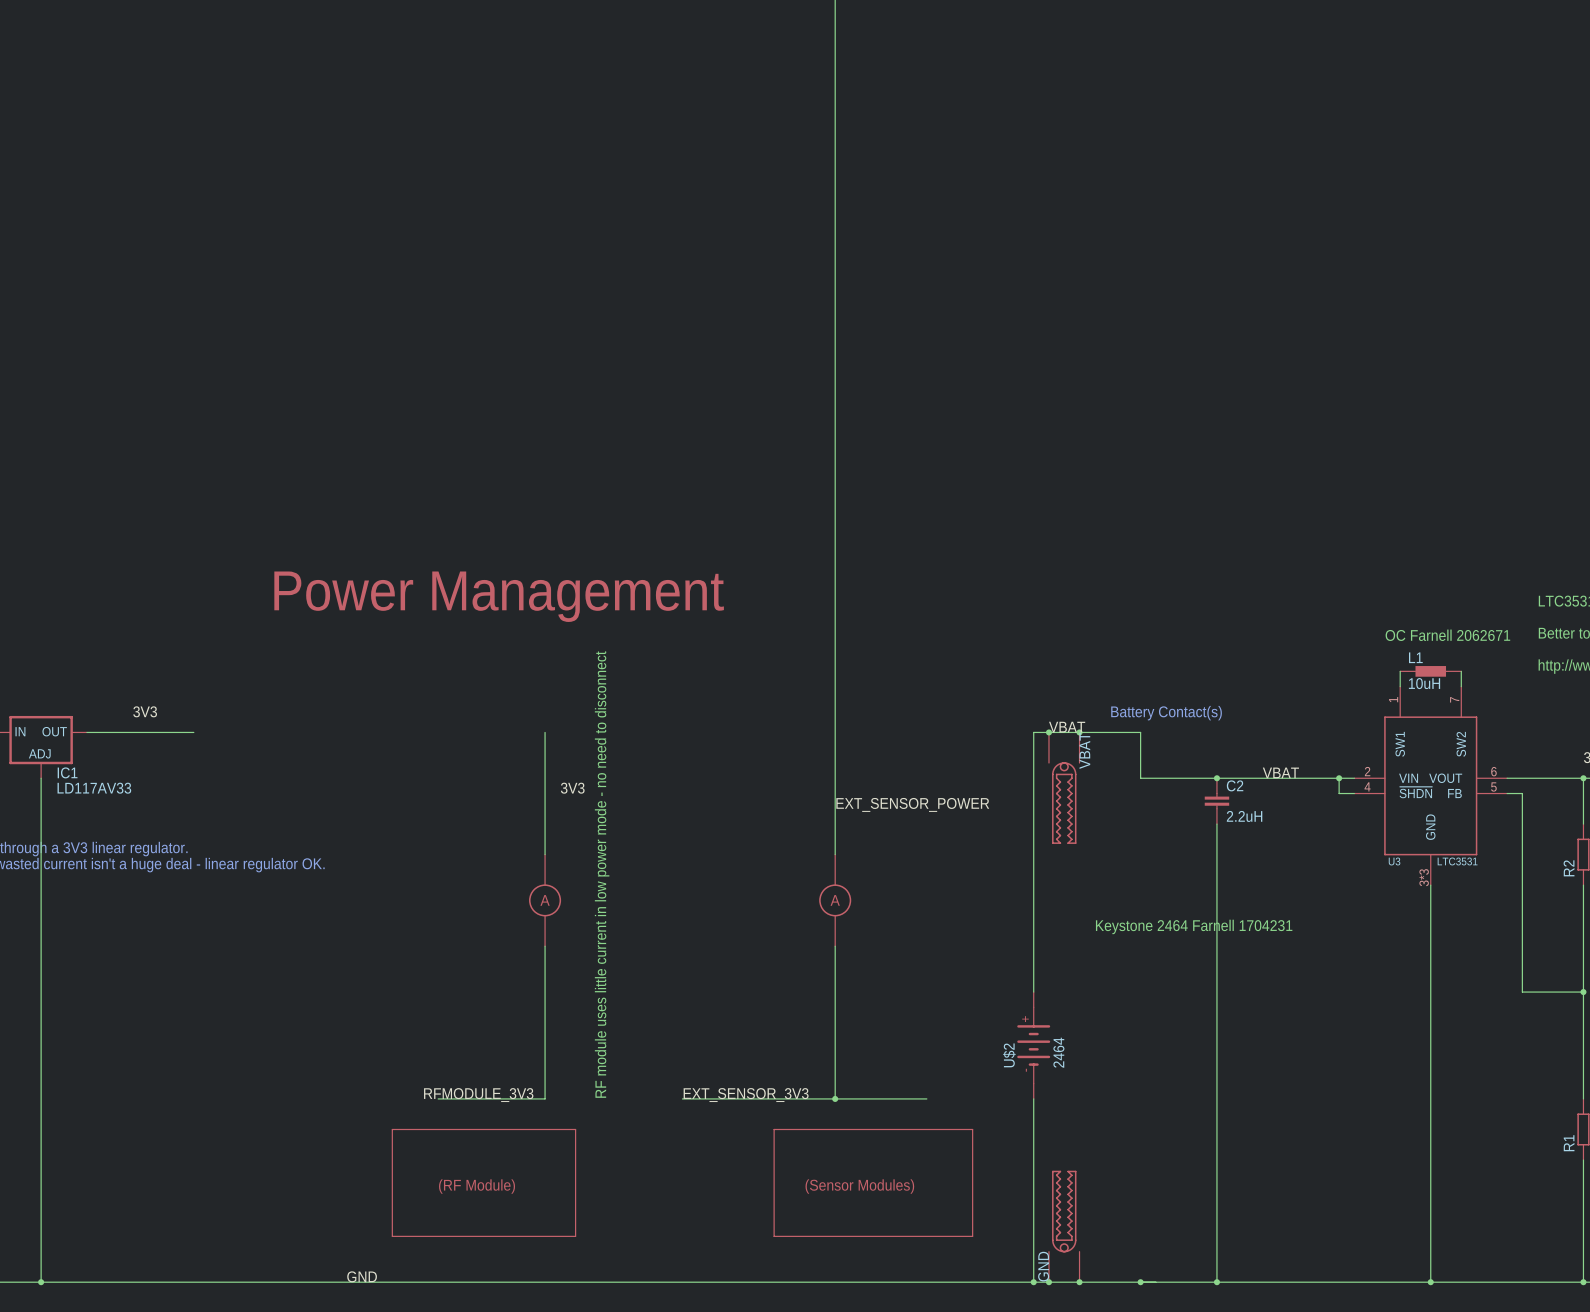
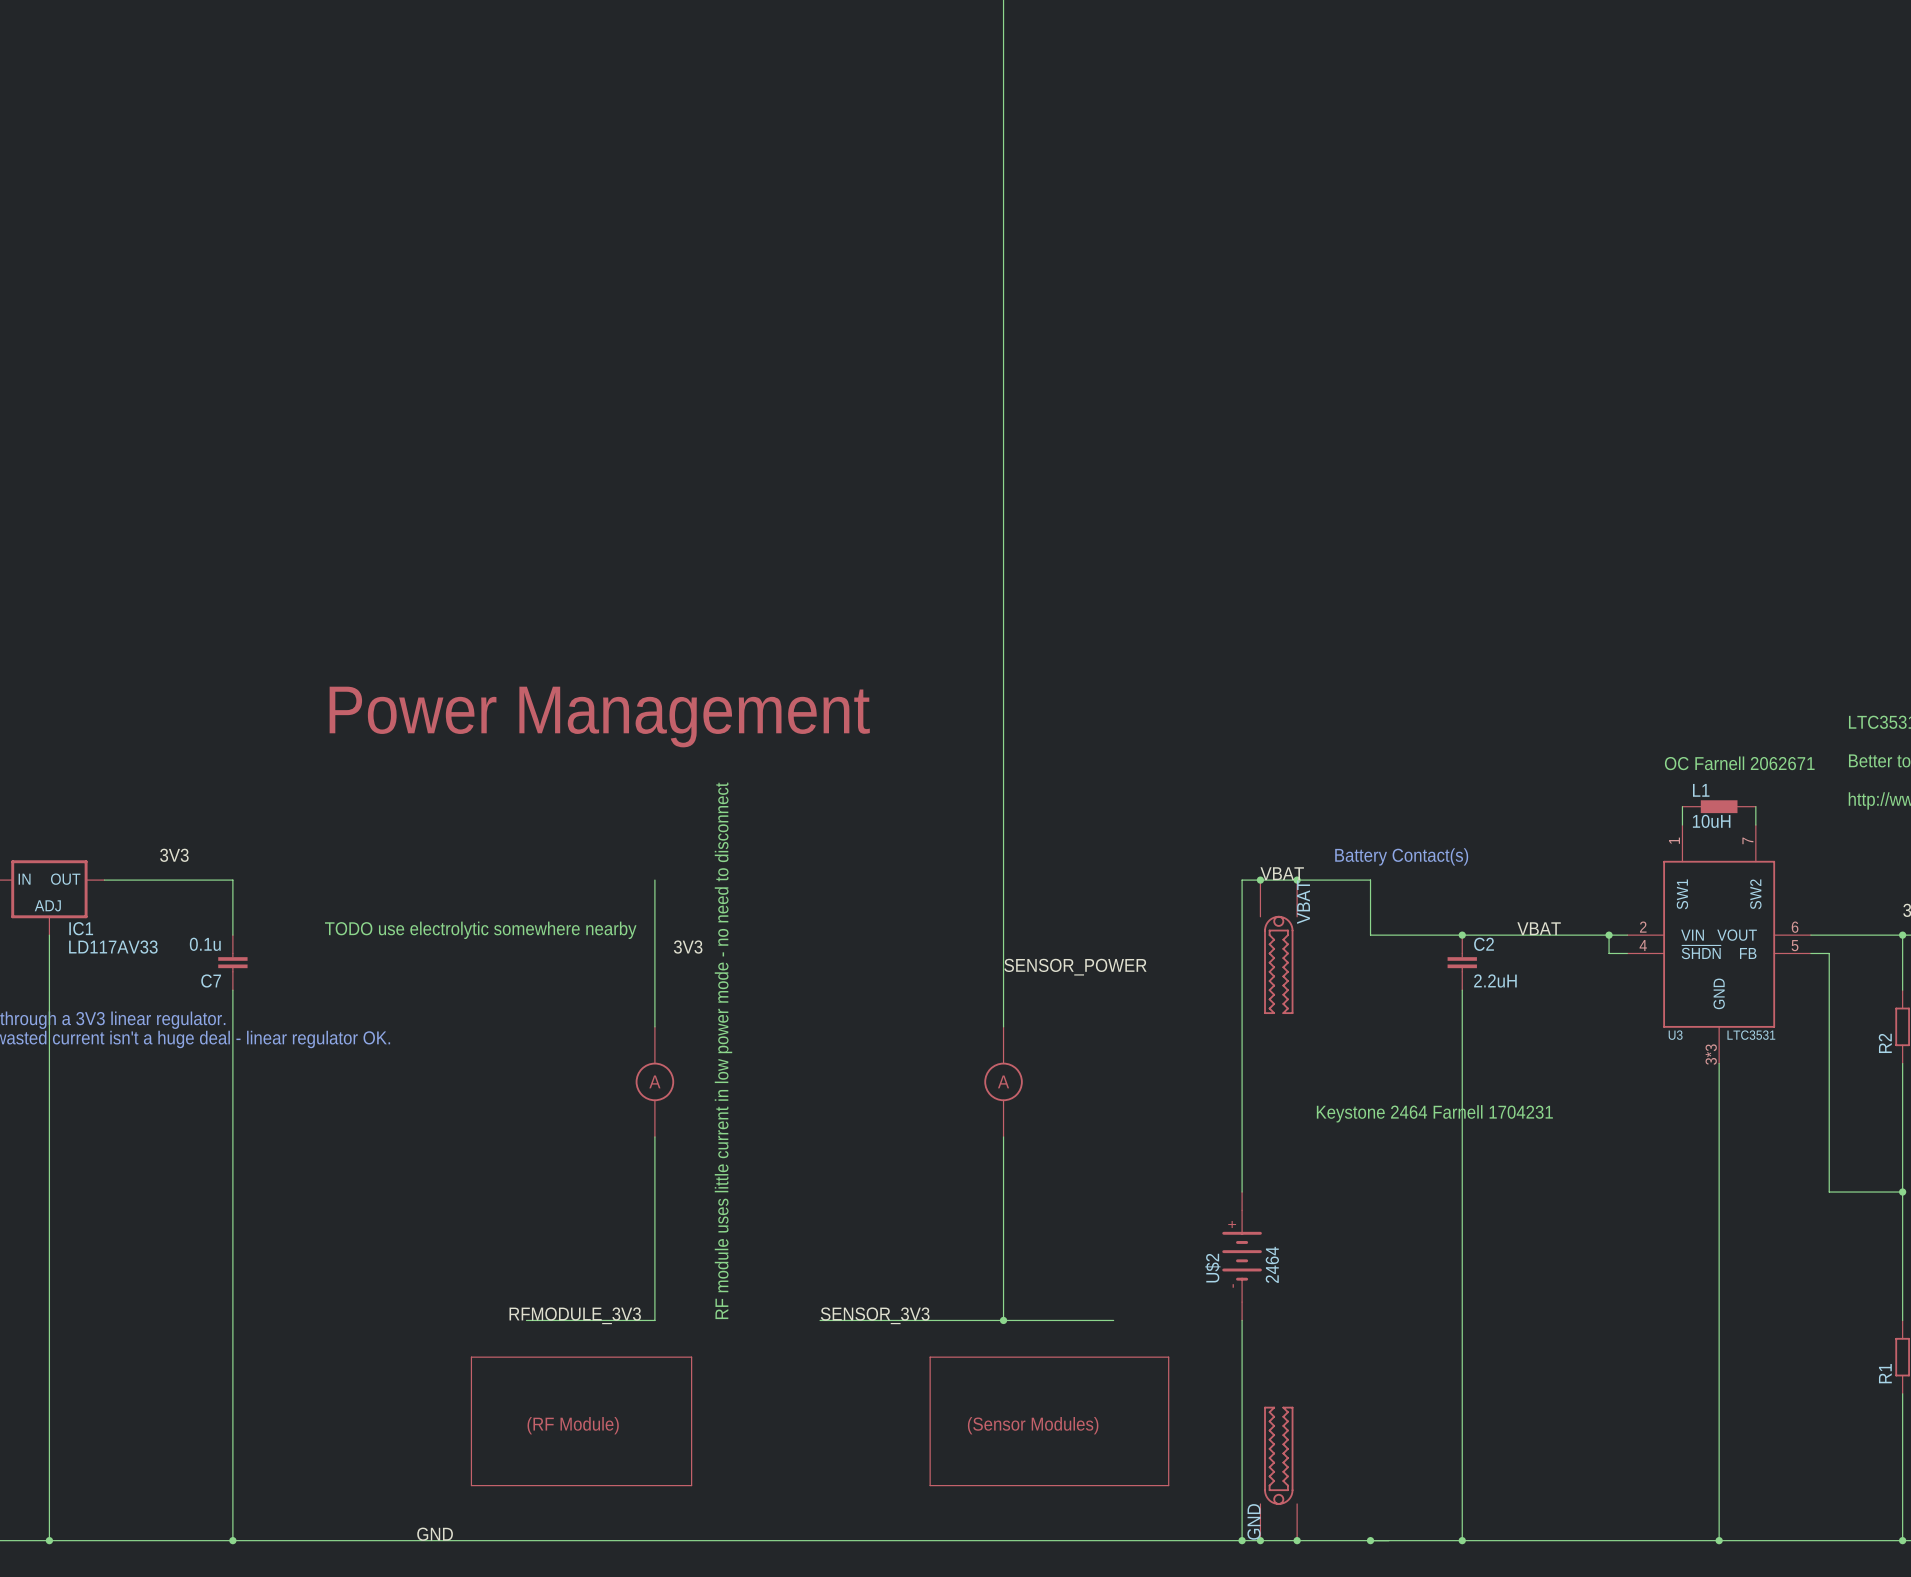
wire: none -> (232, 880) (232, 935)
text: none -> TODO use electrolytic somewhere nearby (480, 930)
C7: none -> 0.1u (232, 962)
label: EXT_SENSOR_POWER (912, 804) -> SENSOR_POWER (1075, 967)
wire: none -> (232, 990) (232, 1540)
label: EXT_SENSOR_3V3 (746, 1095) -> SENSOR_3V3 (875, 1315)
junction: none -> (232, 1540)

